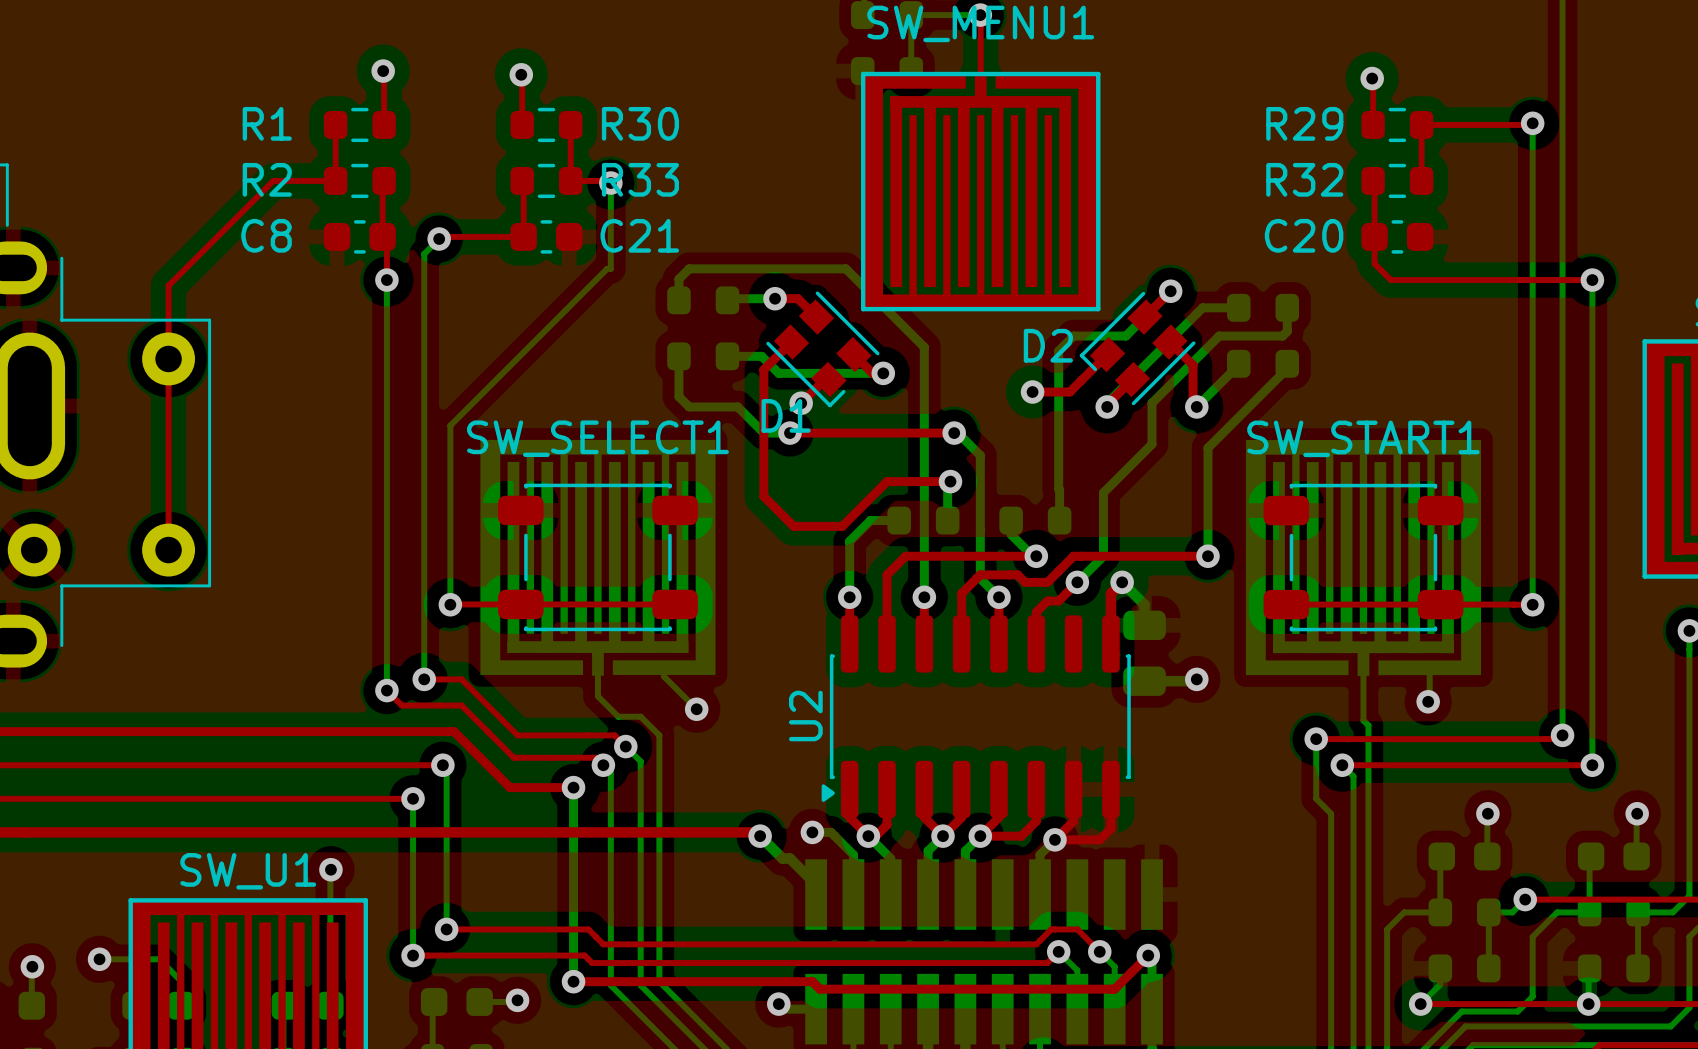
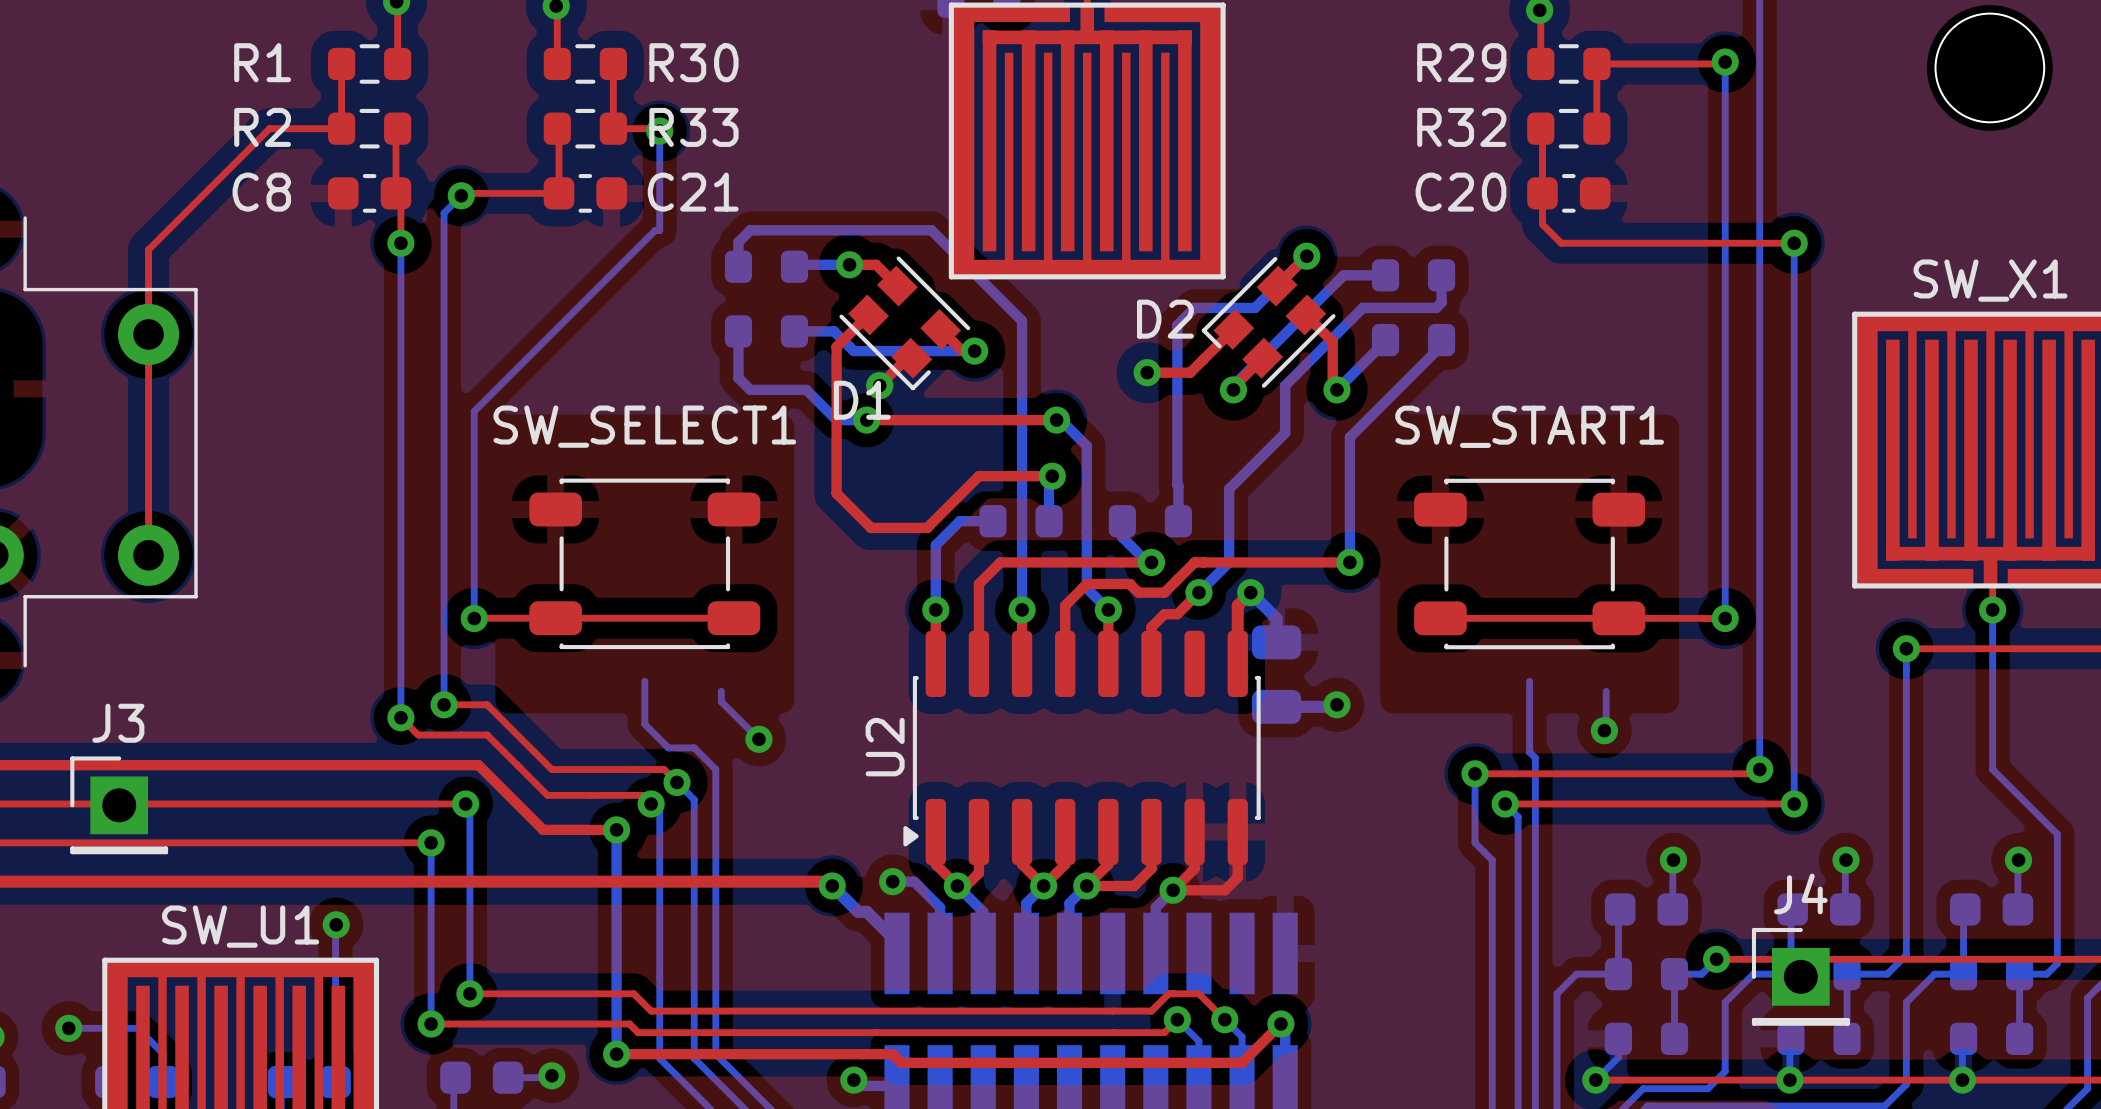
part: (597, 557) -> none
part: (1363, 557) -> none
J3: none -> (119, 805)
J4: none -> (1800, 976)

